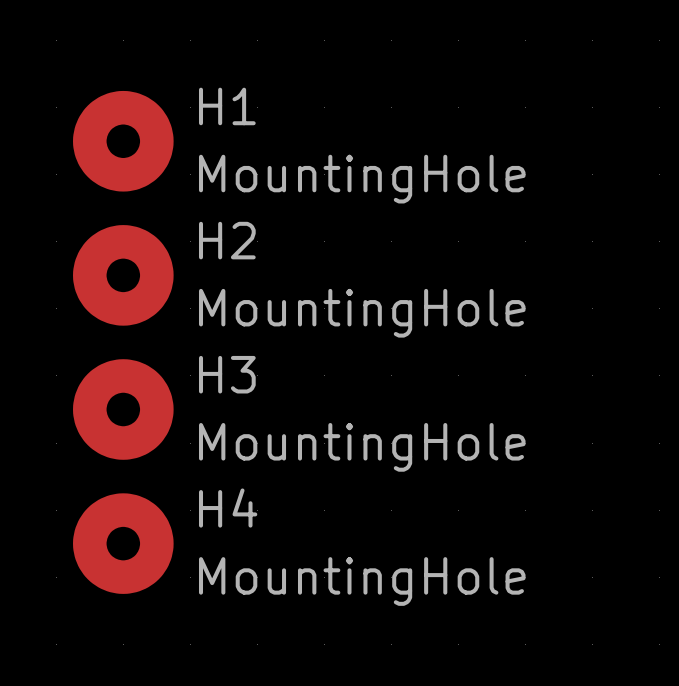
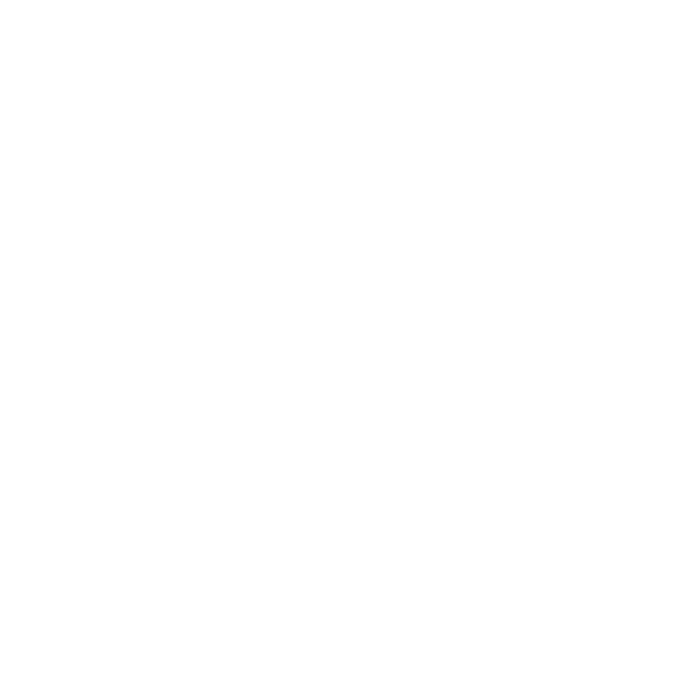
H1: MountingHole (123, 141) -> none
H2: MountingHole (123, 275) -> none
H3: MountingHole (123, 409) -> none
H4: MountingHole (123, 543) -> none

